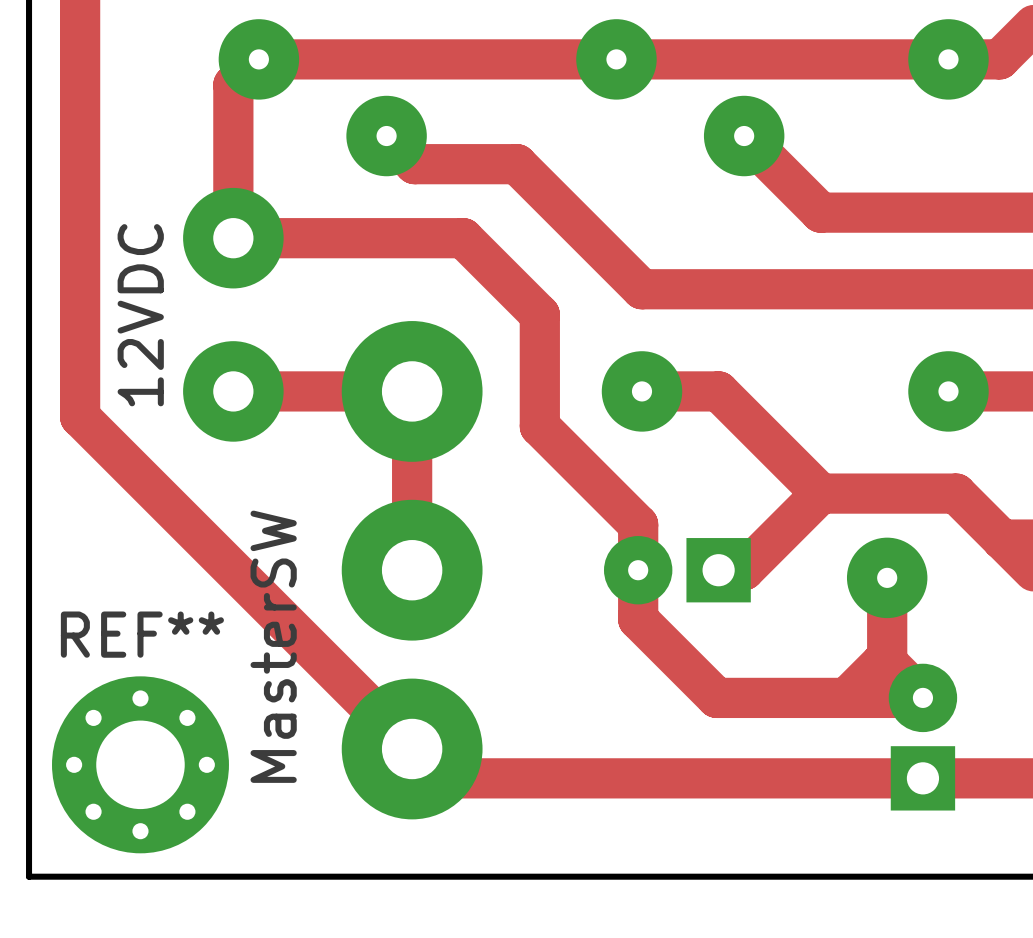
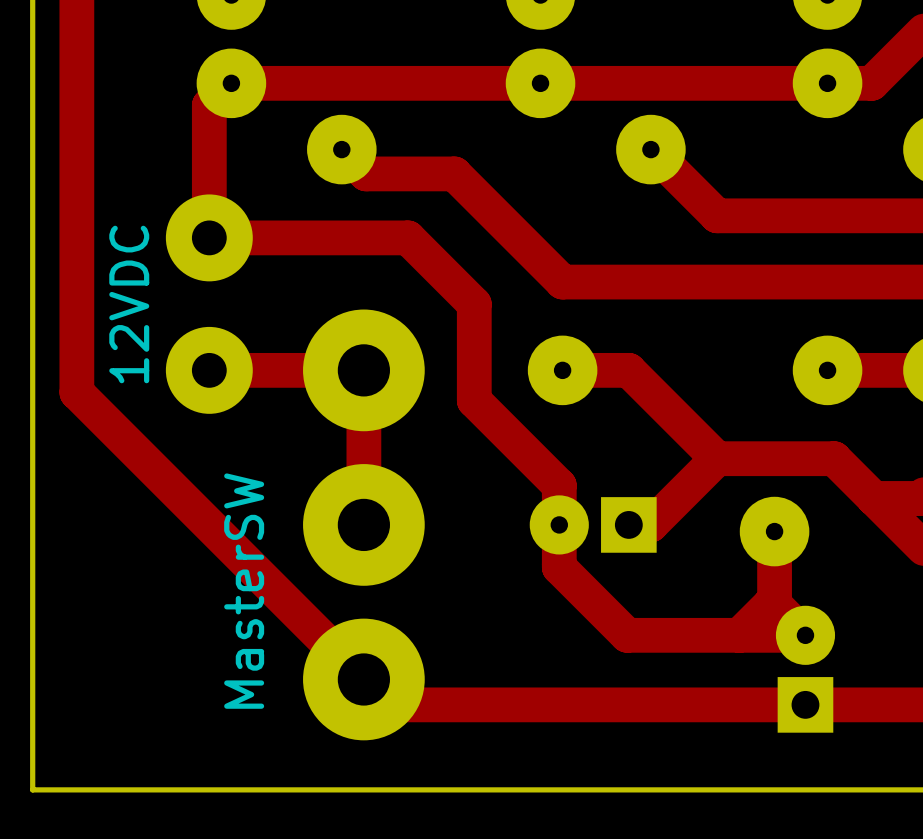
REF**: (140, 764) -> none

